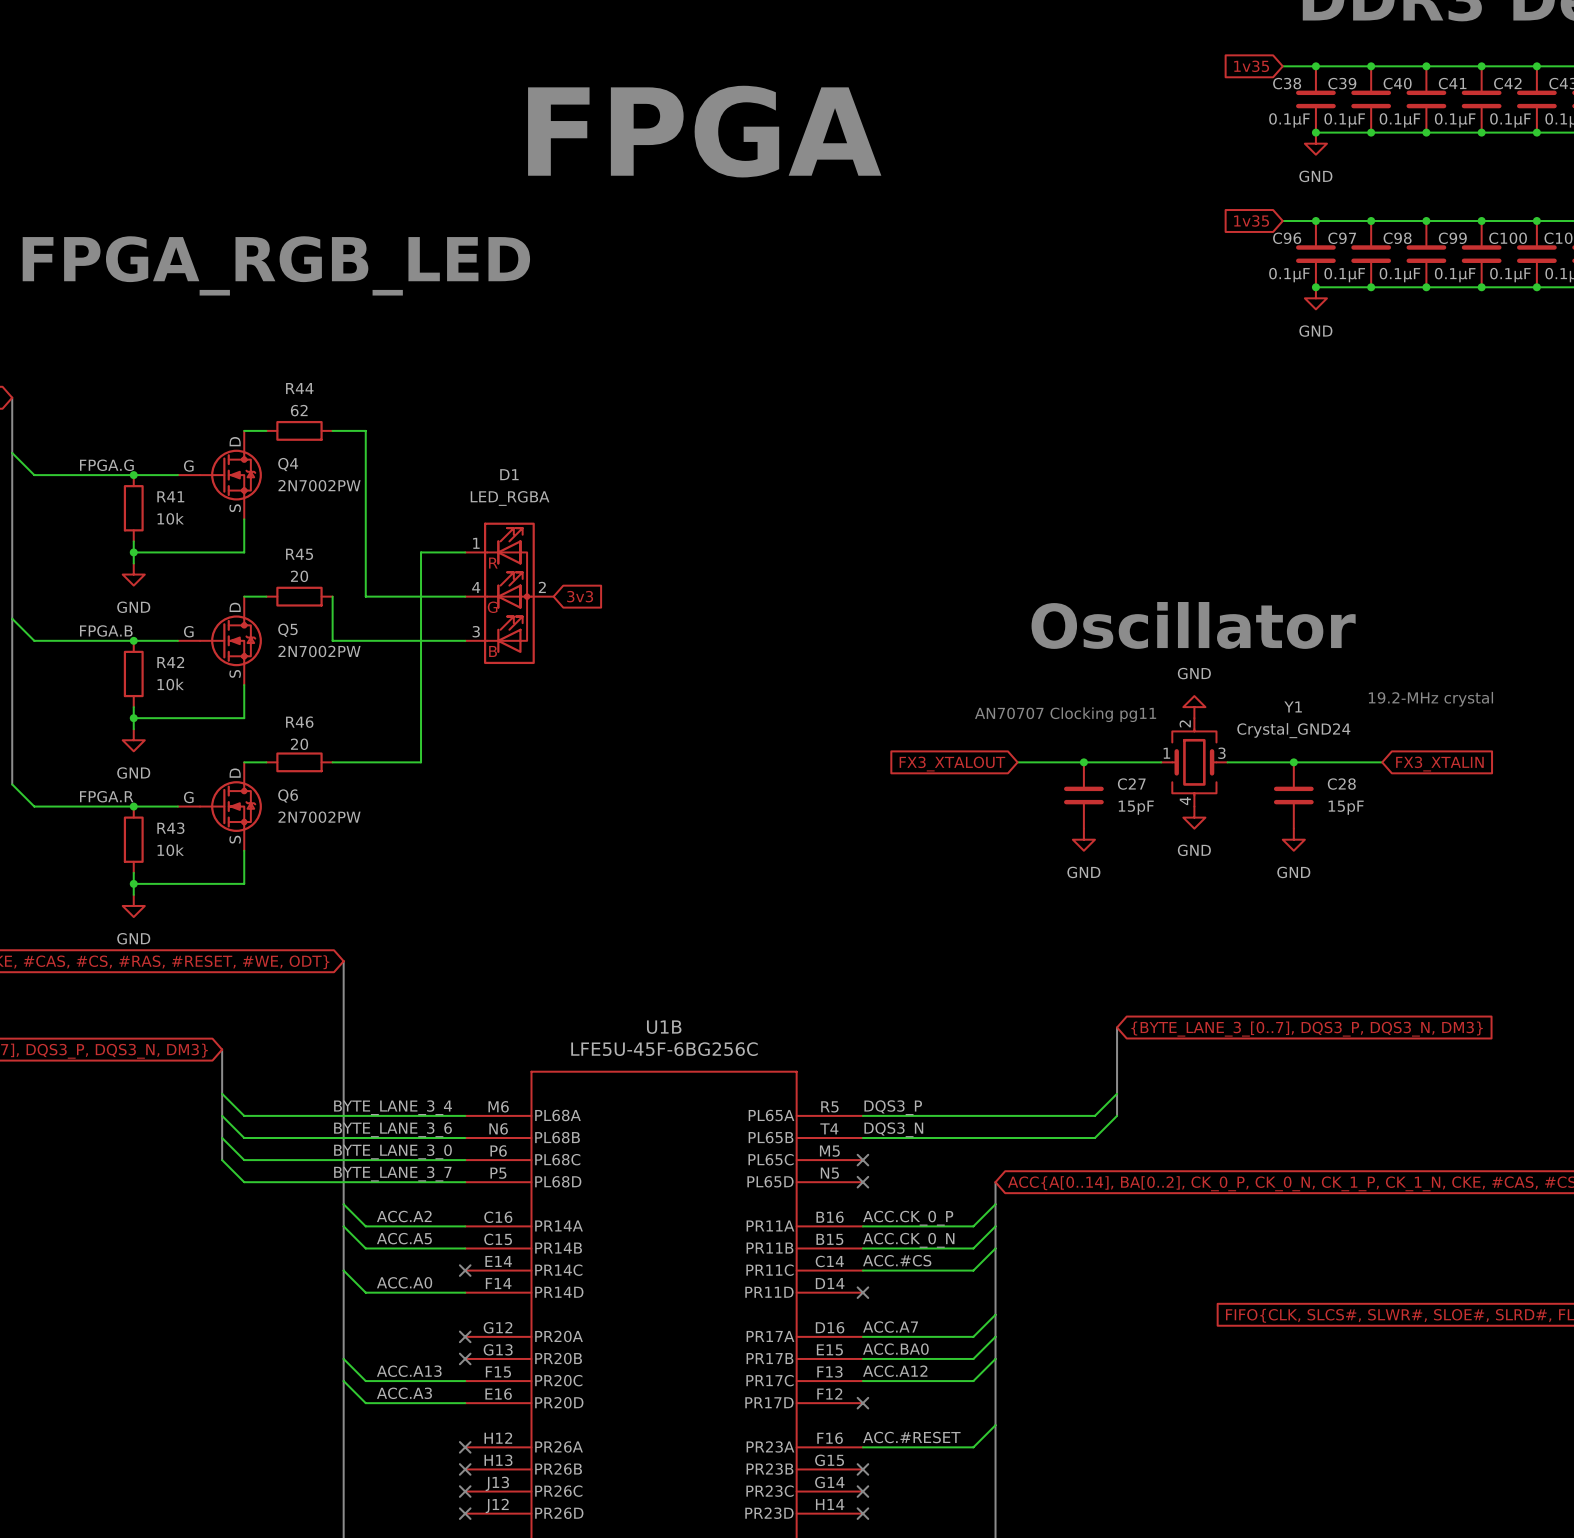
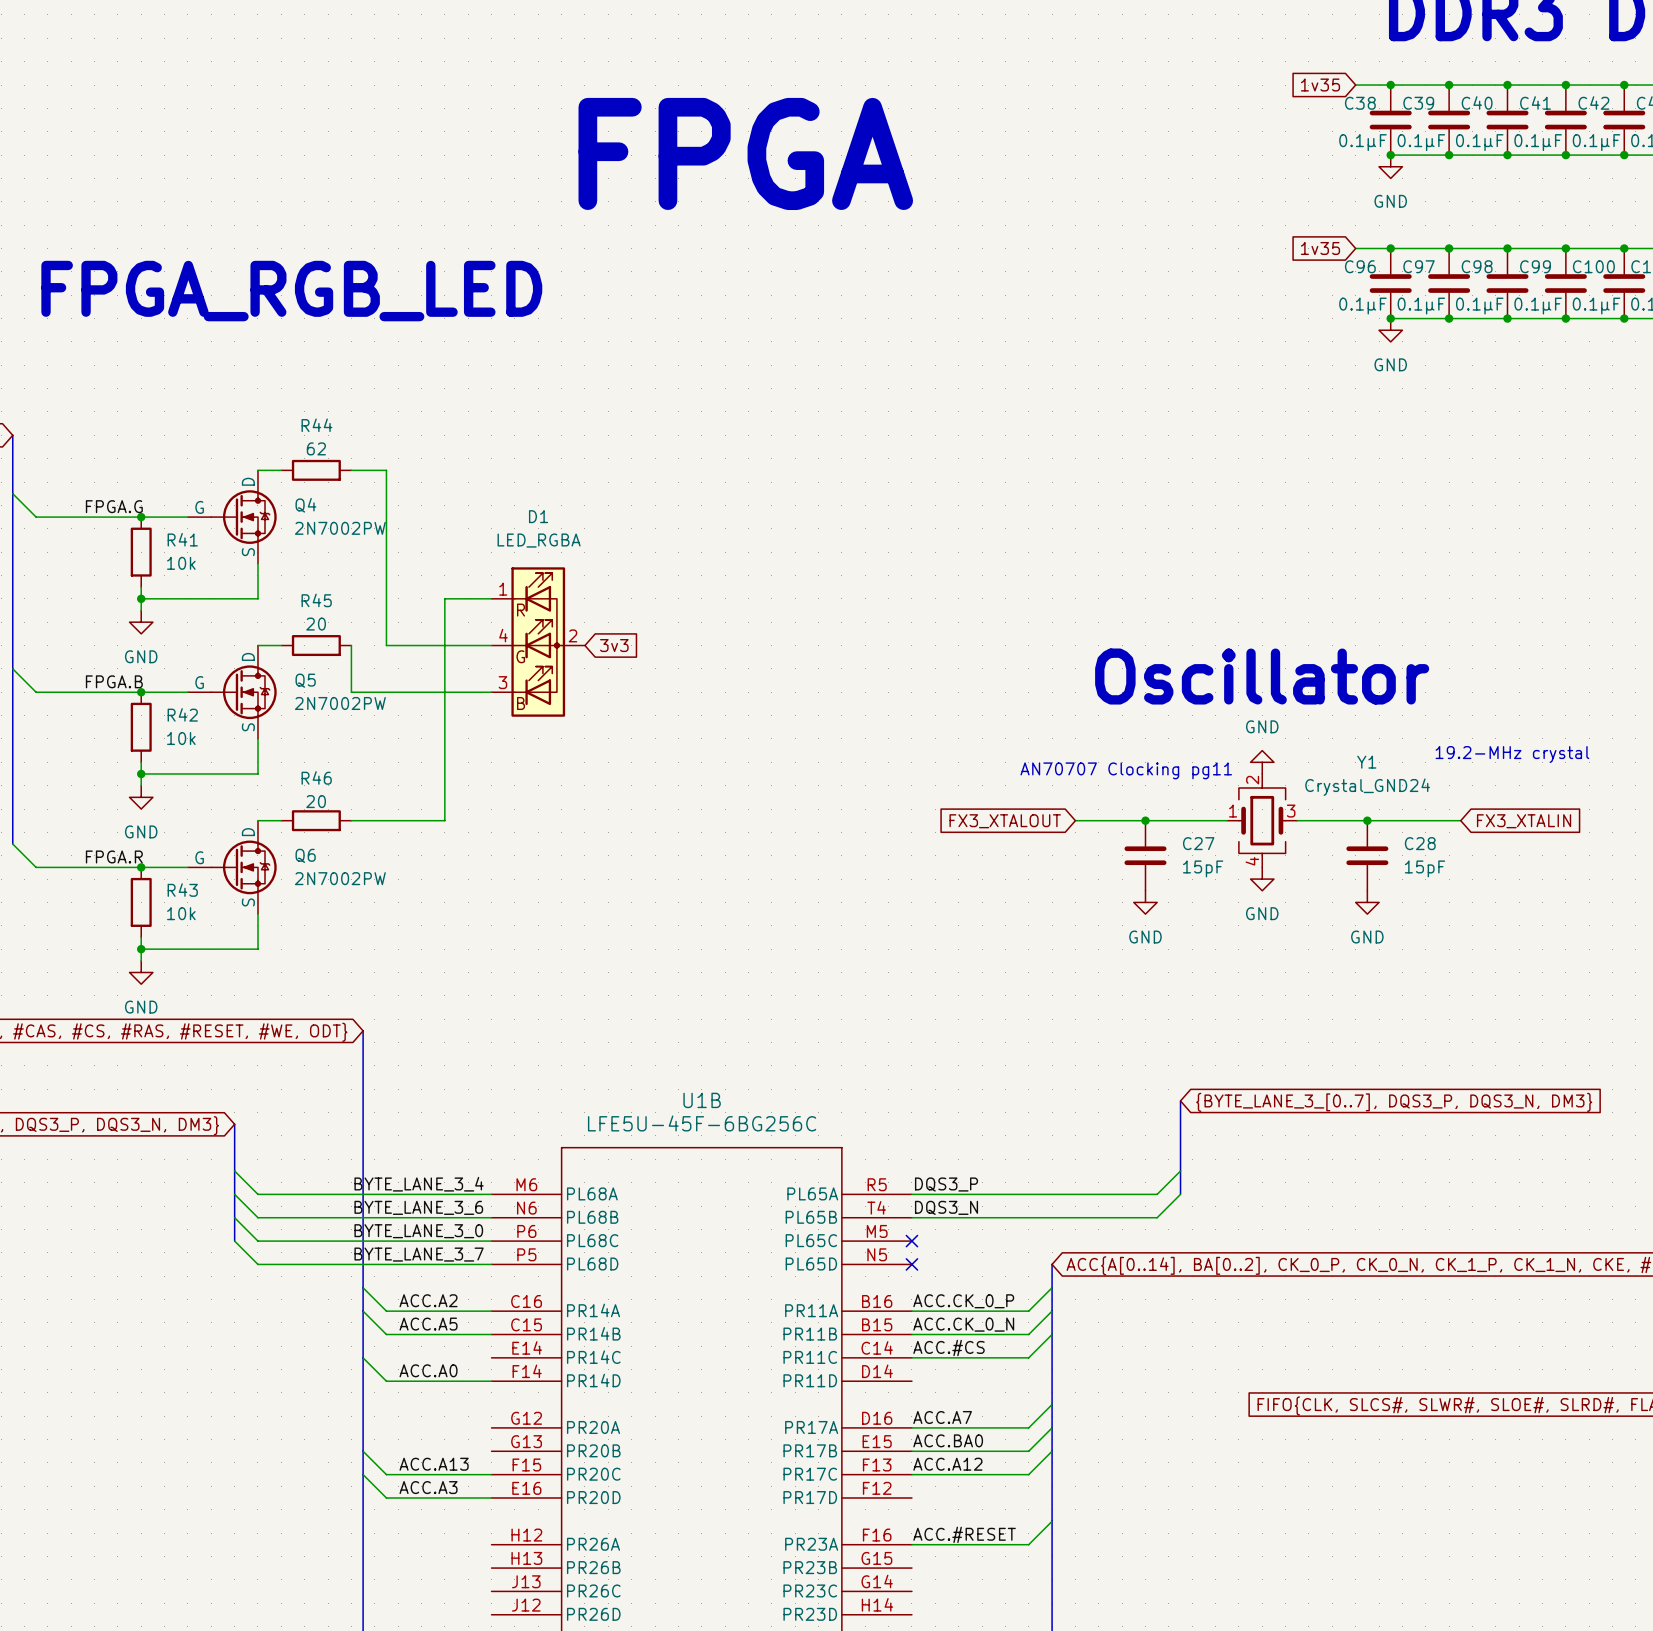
no-connect mark: (465, 1270) -> none
no-connect mark: (862, 1292) -> none
no-connect mark: (465, 1336) -> none
no-connect mark: (465, 1358) -> none
no-connect mark: (862, 1403) -> none
no-connect mark: (465, 1447) -> none
no-connect mark: (465, 1469) -> none
no-connect mark: (862, 1469) -> none
no-connect mark: (465, 1491) -> none
no-connect mark: (862, 1491) -> none
no-connect mark: (465, 1513) -> none
no-connect mark: (862, 1513) -> none

